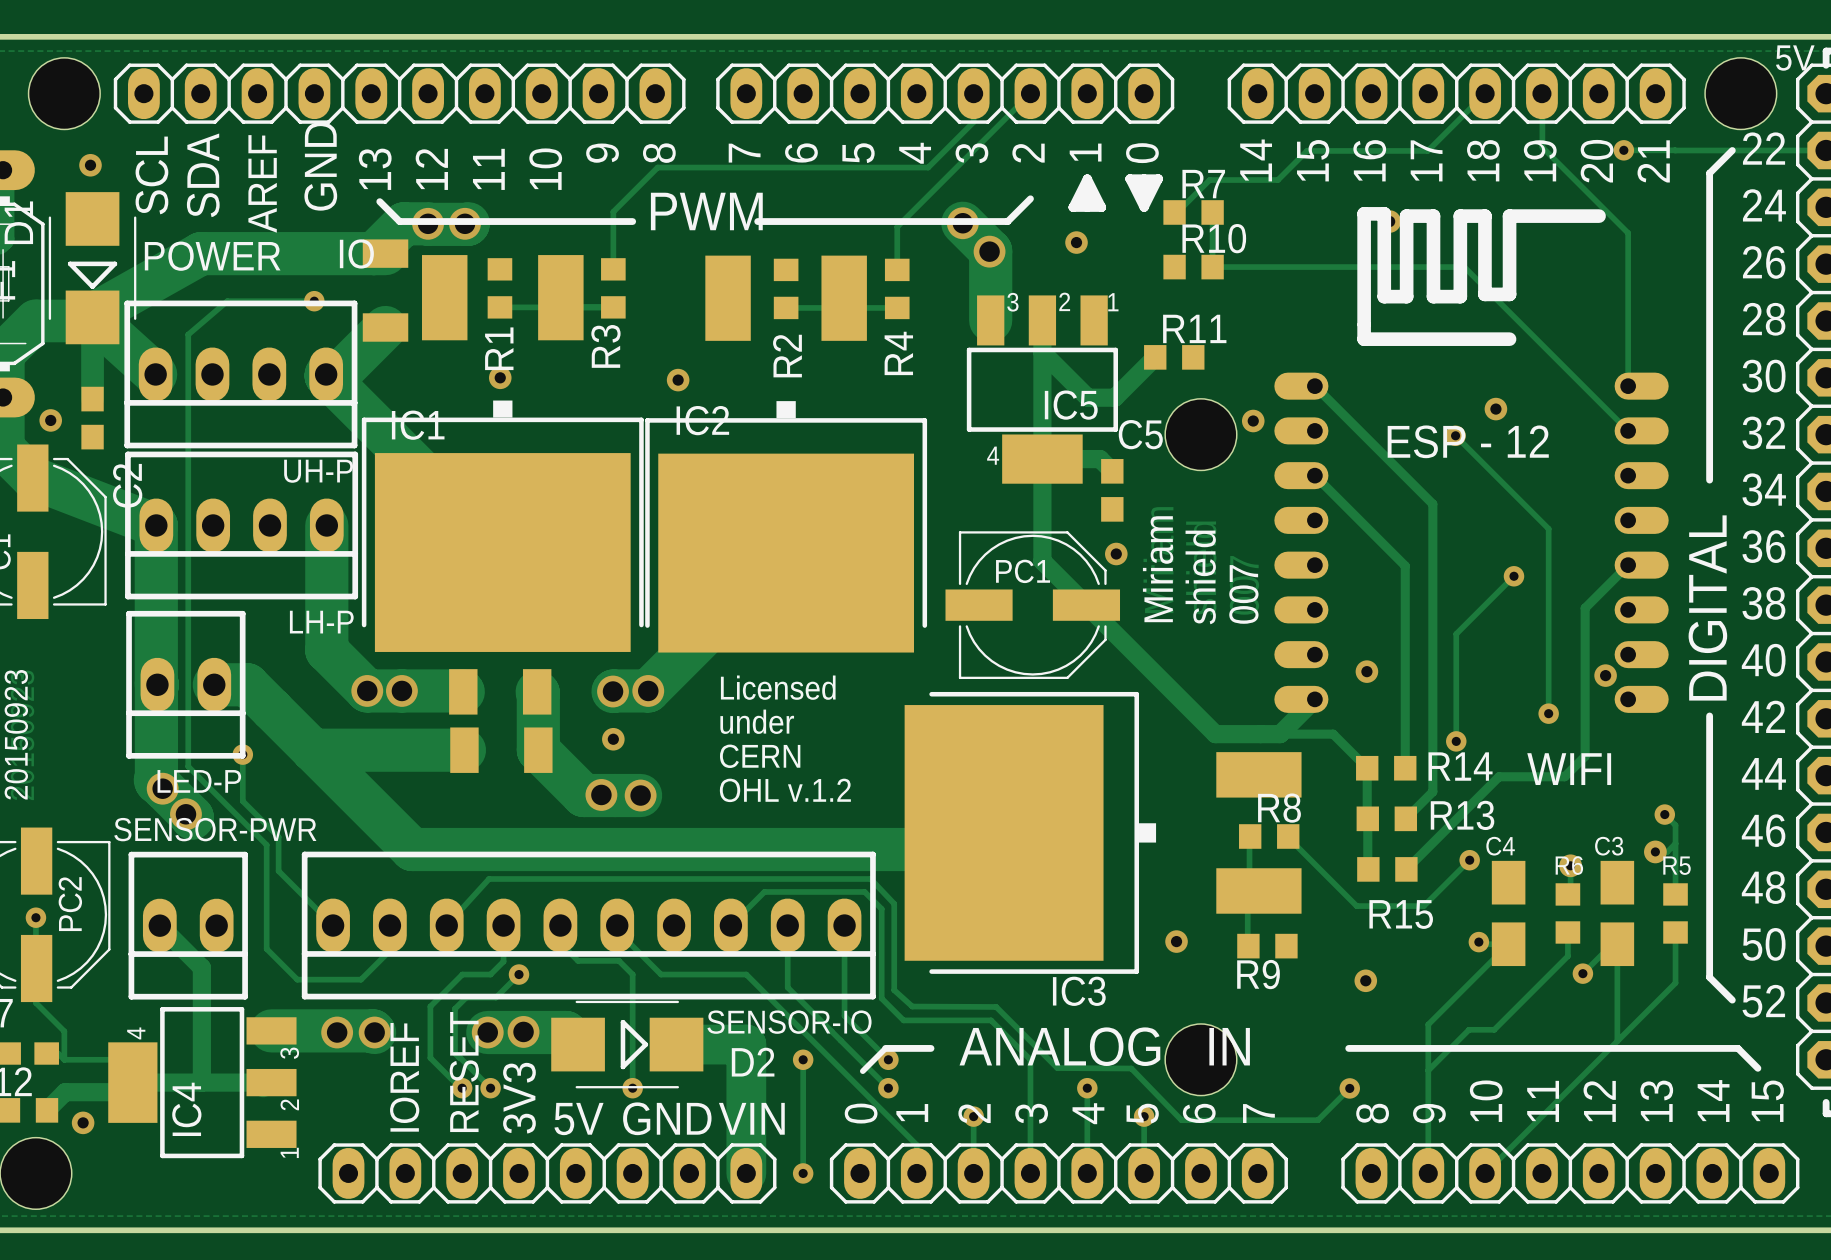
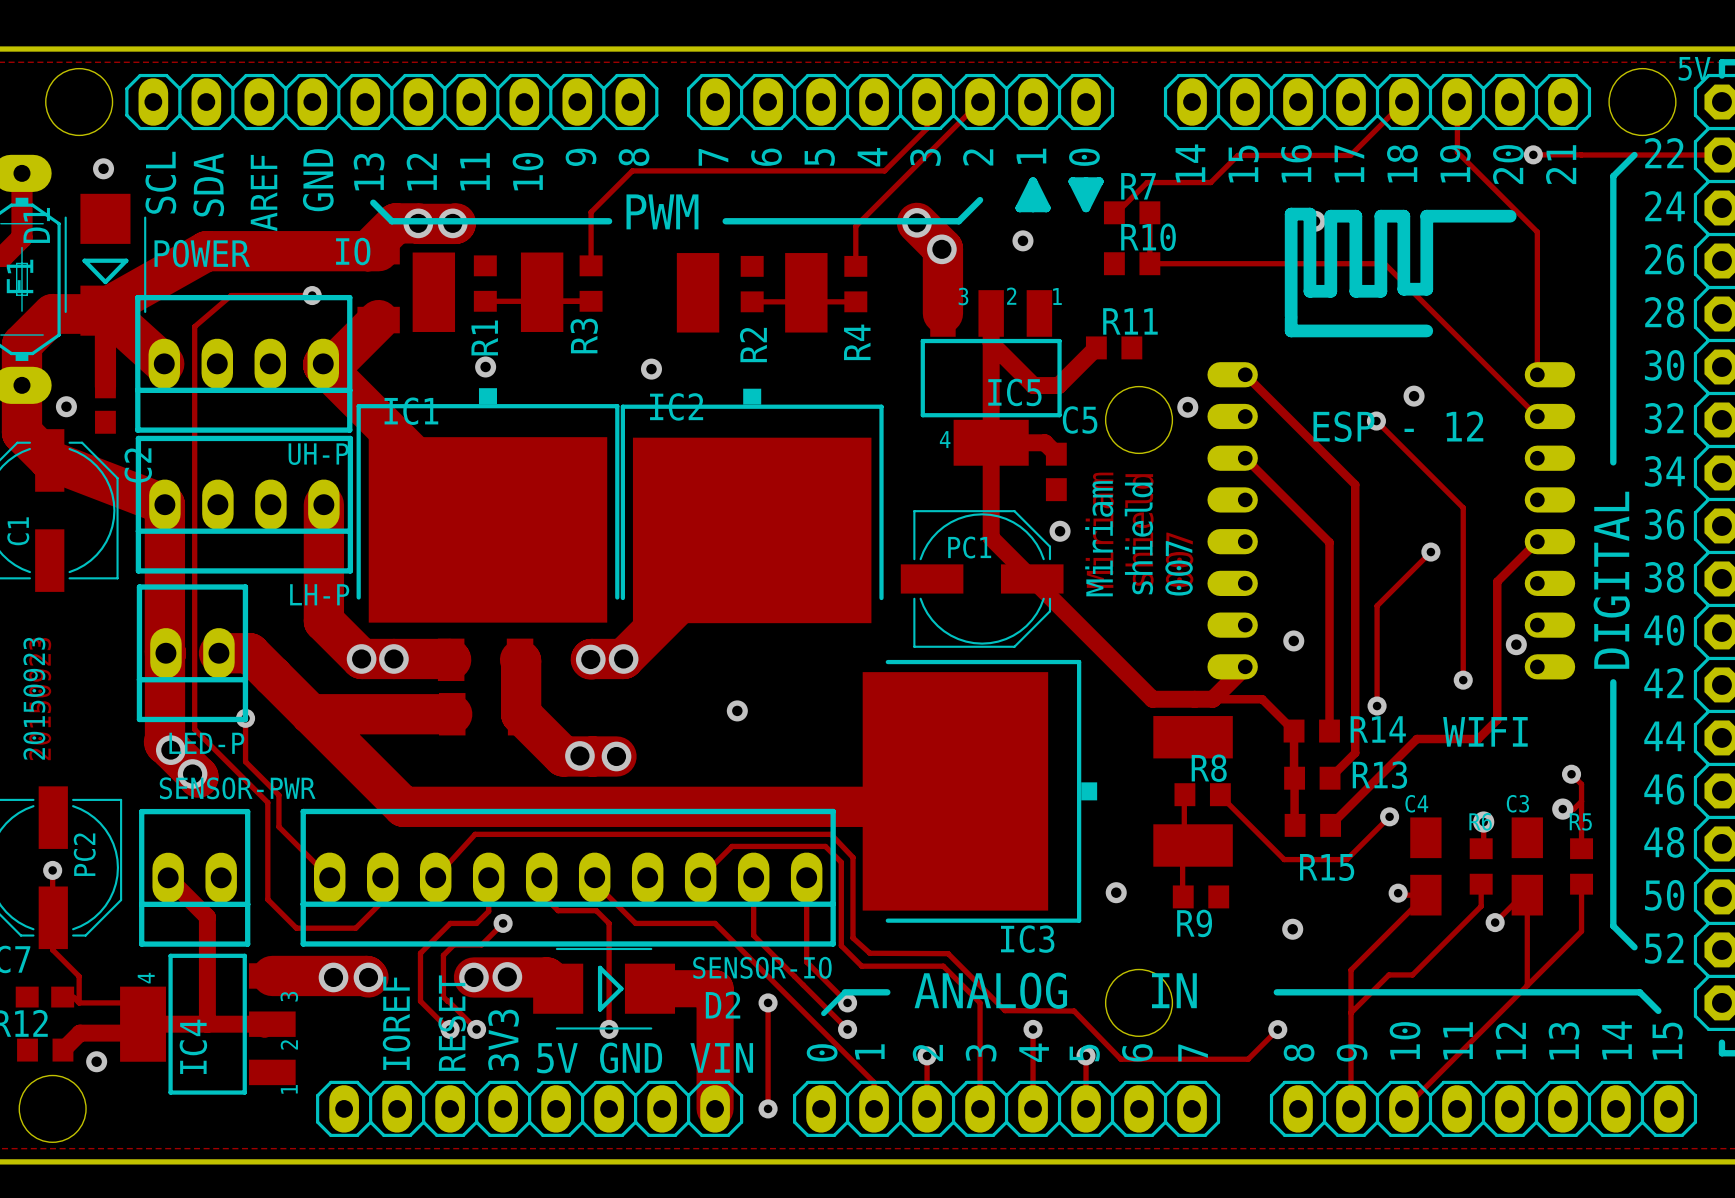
text: Licensed (778, 687) -> none
text: under (757, 721) -> none
via: (613, 739) -> none
via: none -> (737, 710)
text: CERN (760, 756) -> none
text: OHL v.1.2 (785, 790) -> none

